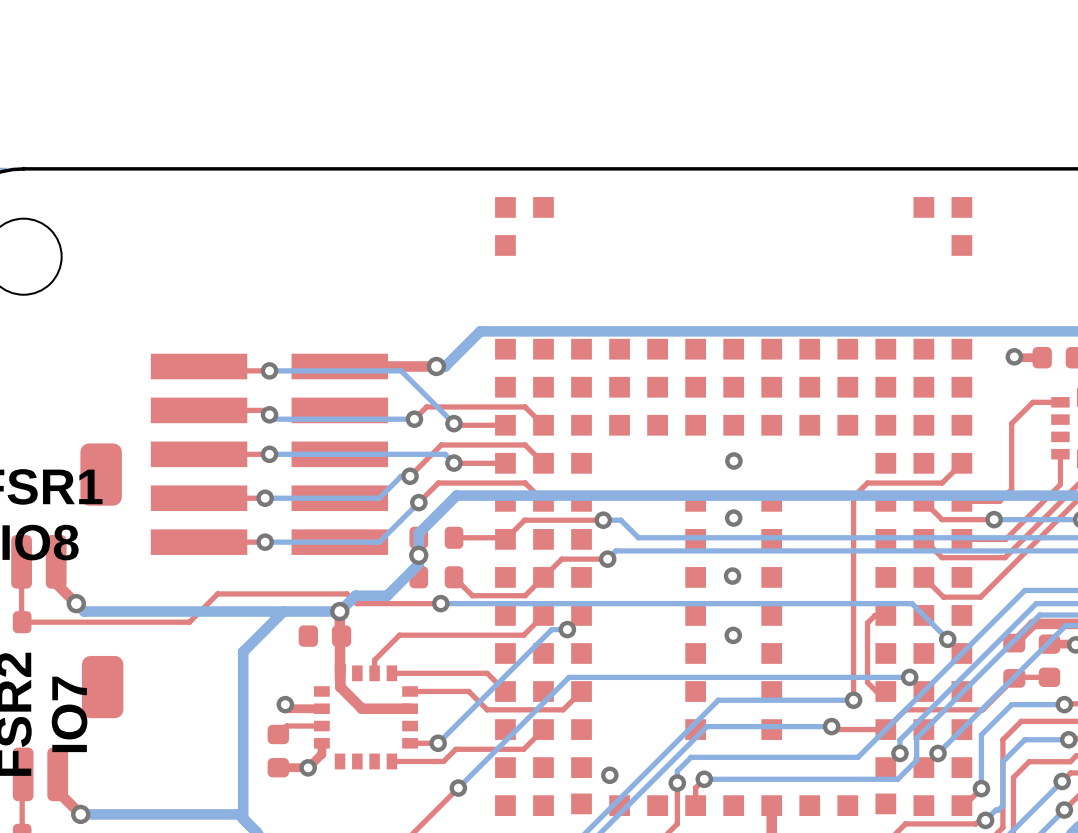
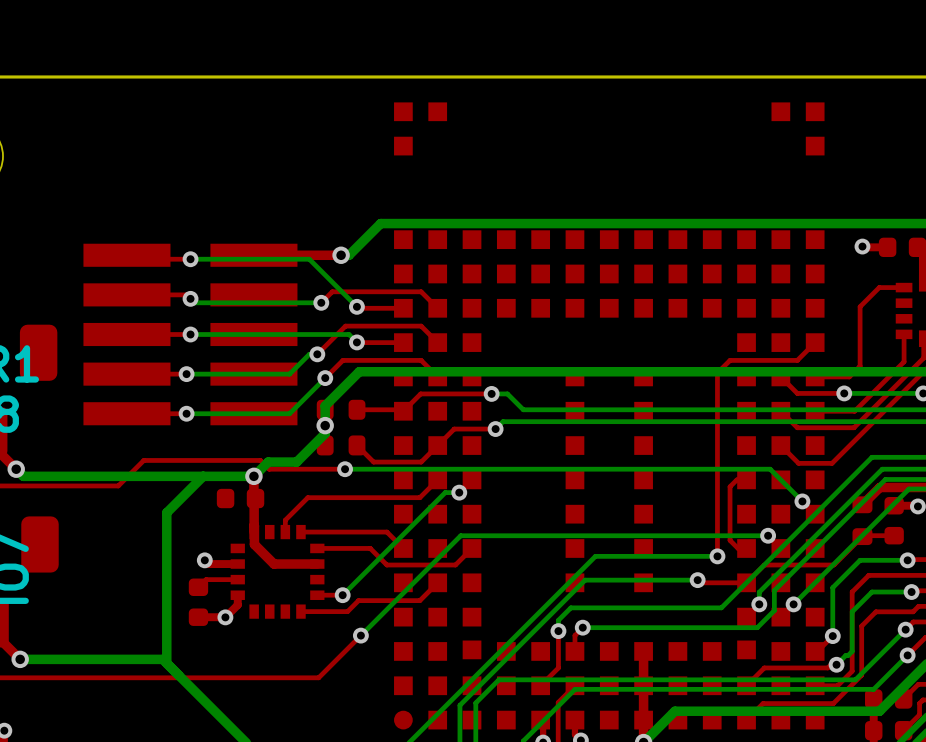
via: (733, 460) -> none
via: (733, 518) -> none
via: (732, 576) -> none
via: (733, 635) -> none
via: (609, 775) -> none

